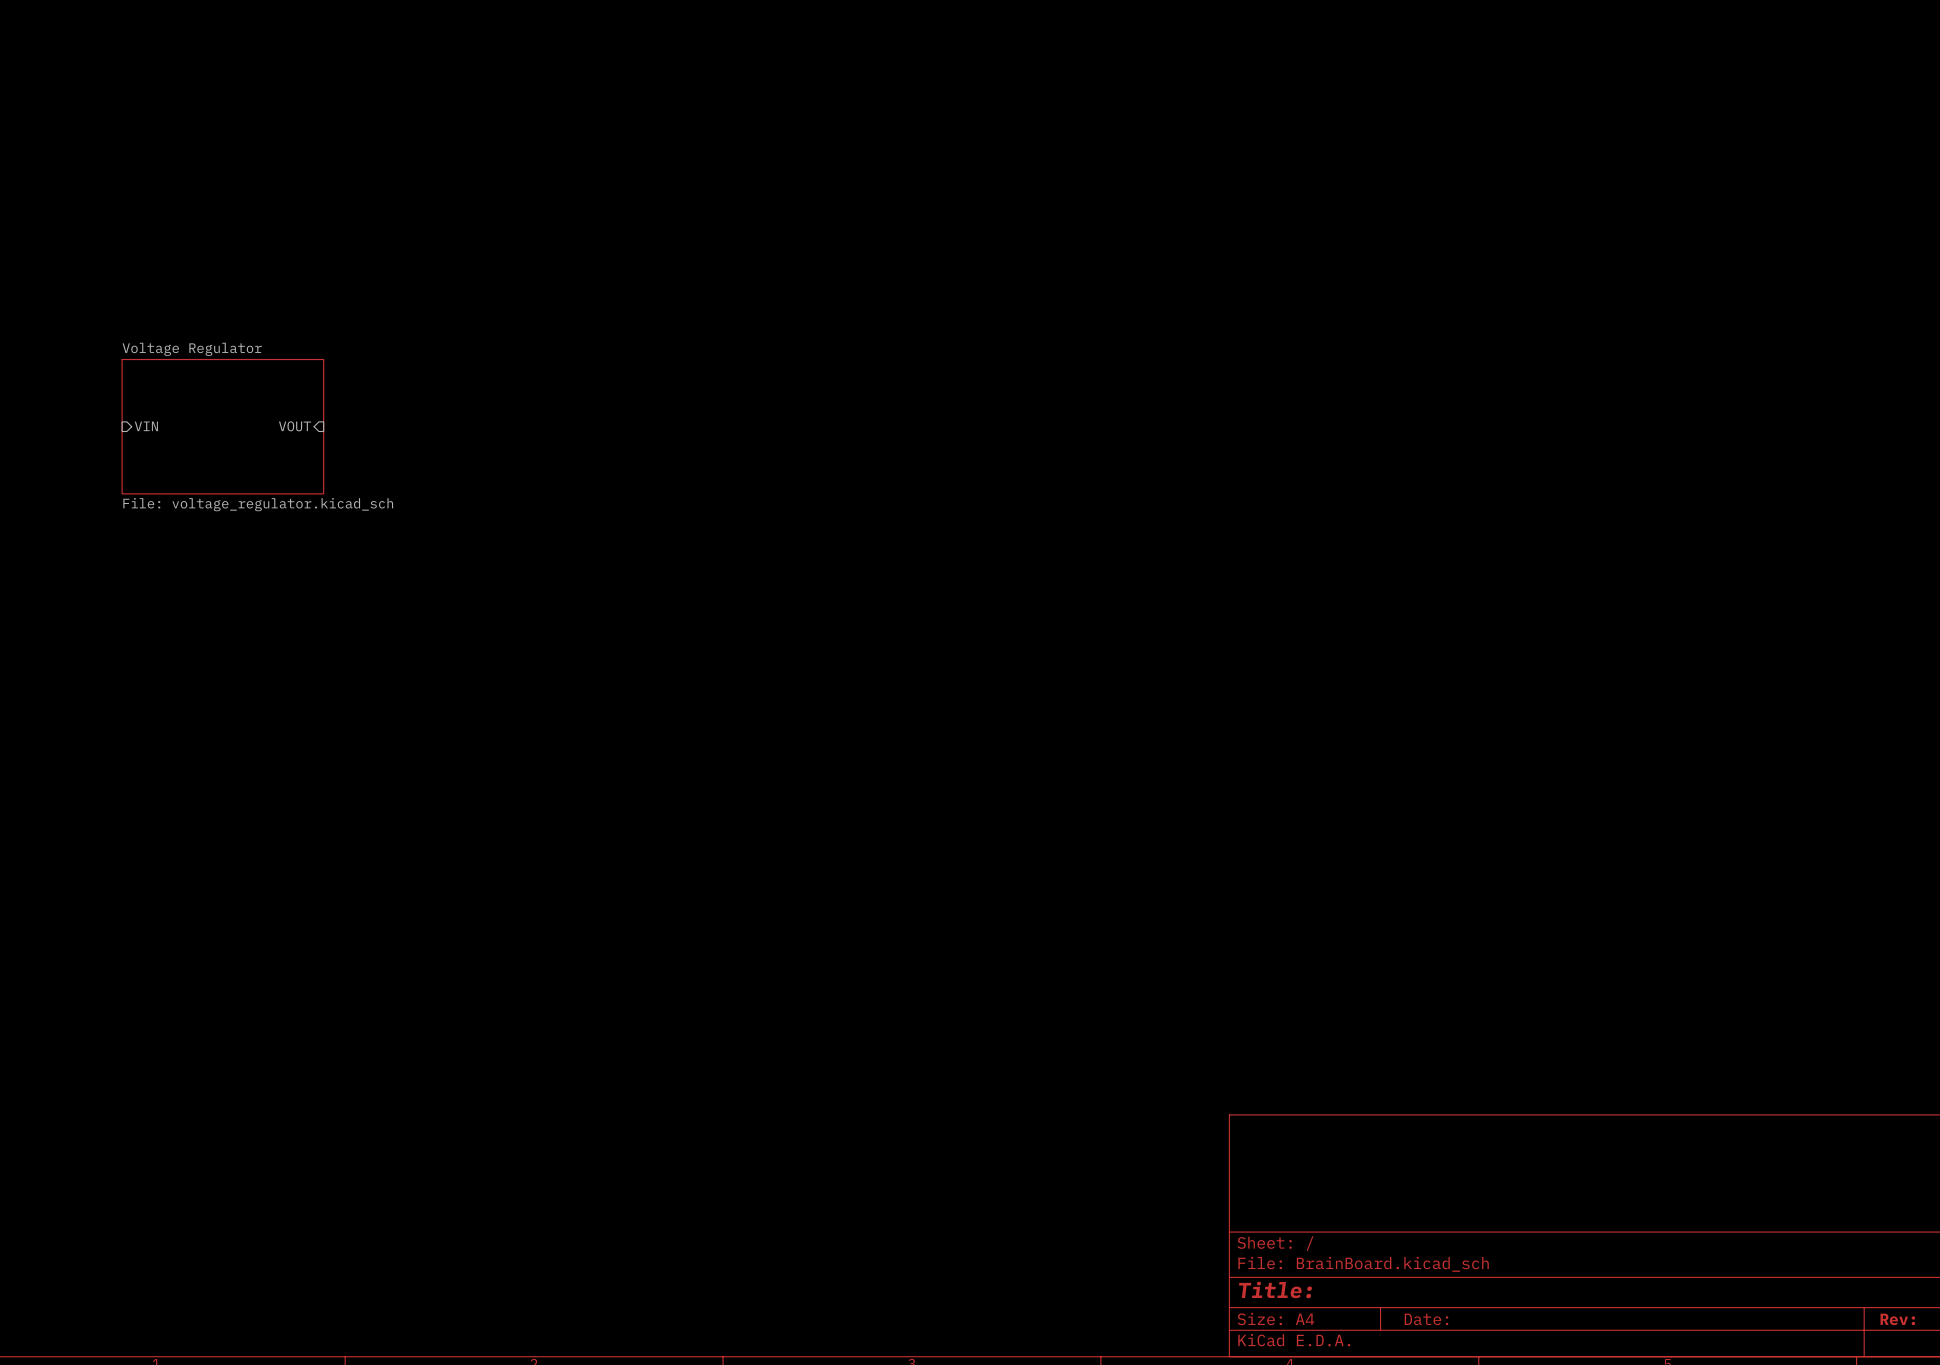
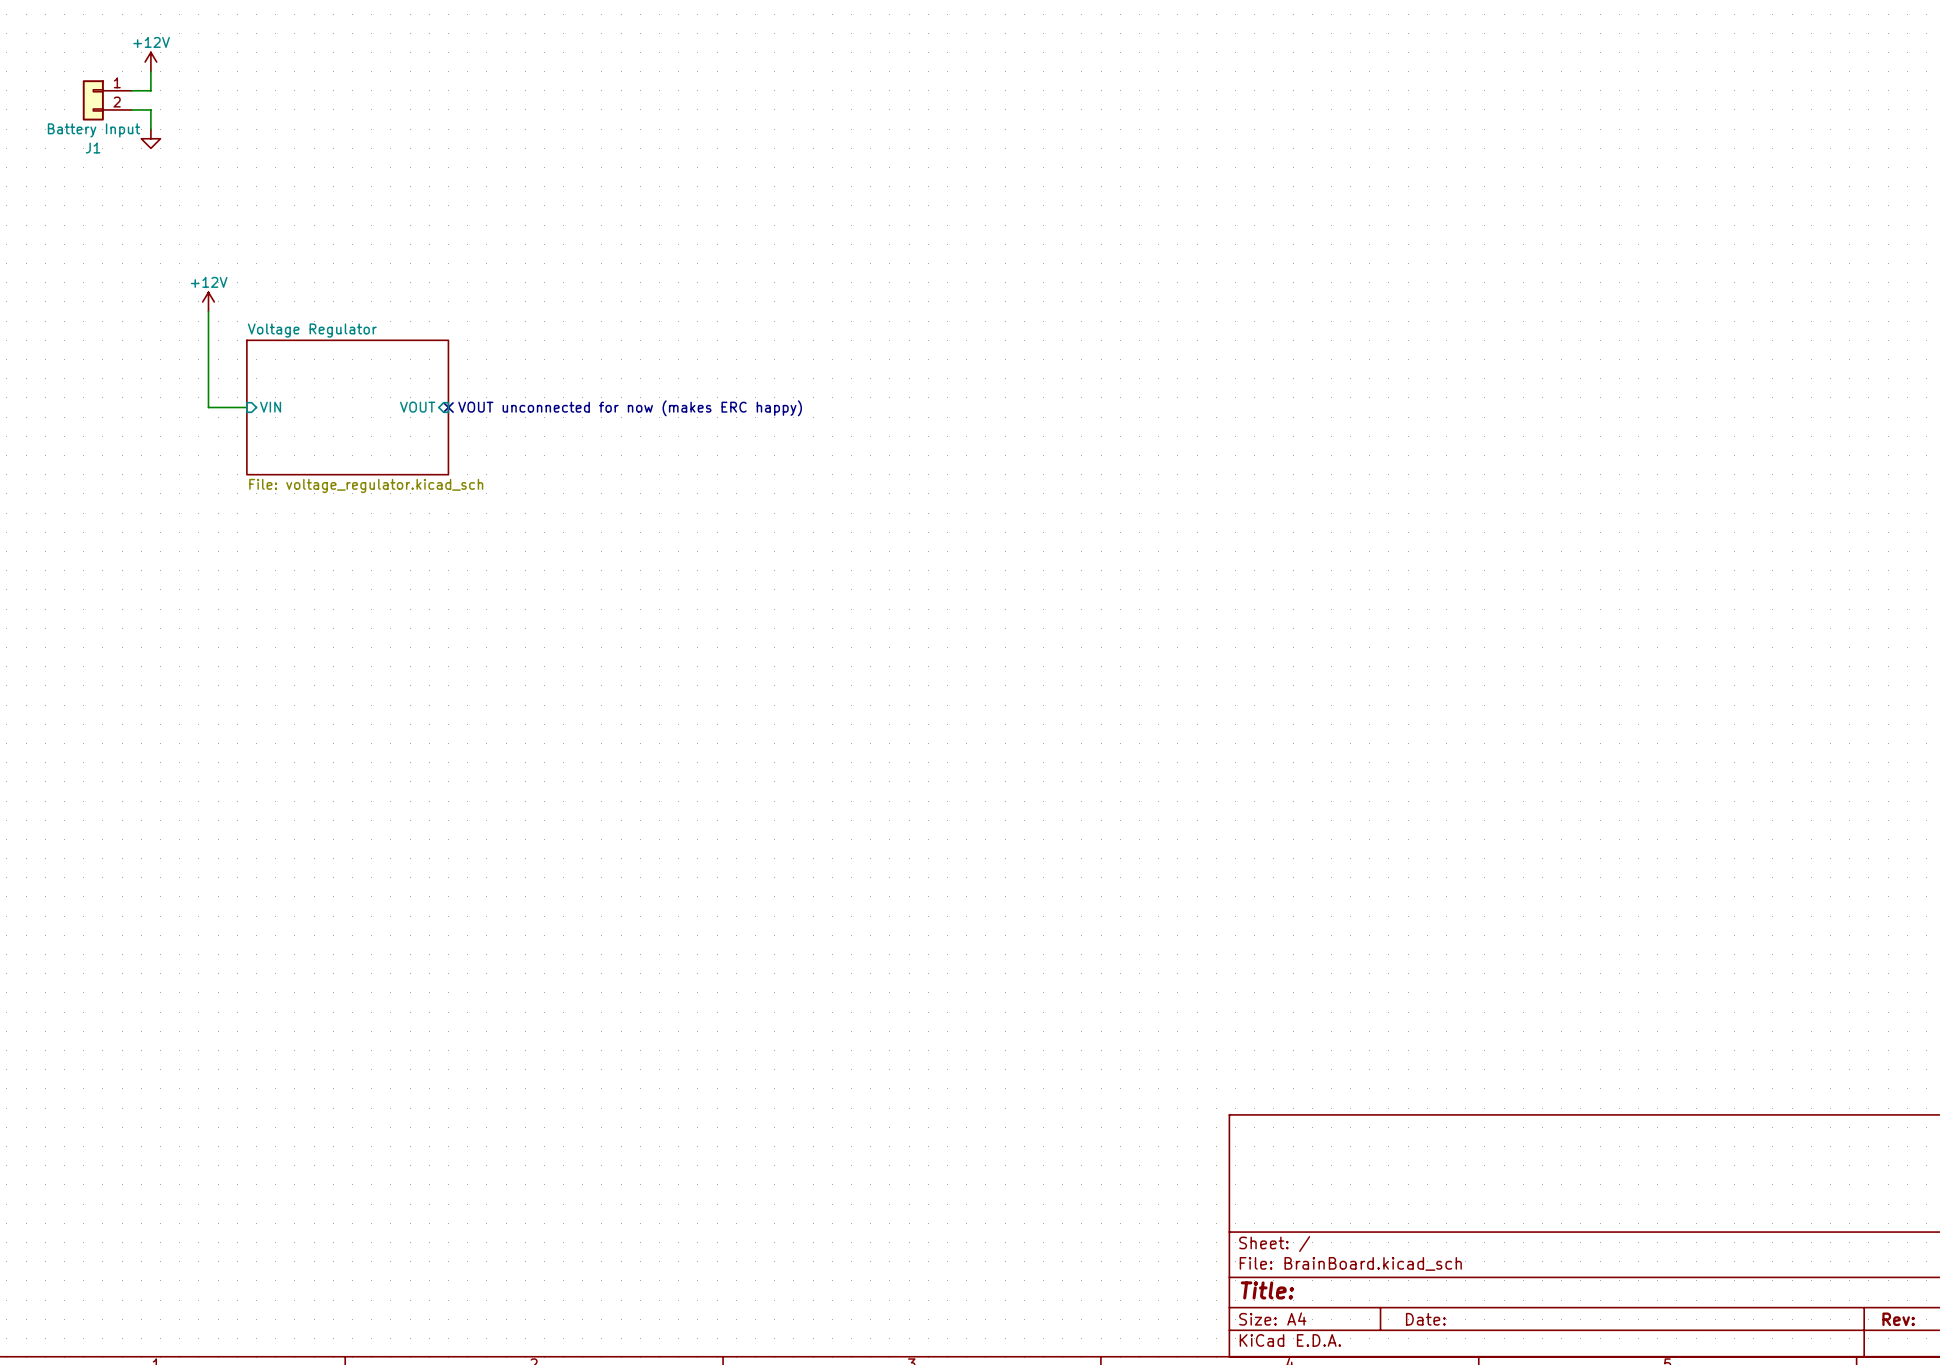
power symbol: none -> +12V (150, 61)
wire: none -> (150, 71) (150, 90) (131, 90)
J1: none -> Battery Input (107, 100)
wire: none -> (131, 109) (150, 109) (150, 129)
power symbol: none -> (150, 138)
power symbol: none -> +12V (208, 301)
wire: none -> (208, 311) (208, 407) (246, 407)
no-connect mark: none -> (448, 407)
text: none -> VOUT unconnected for now (makes ERC happy) (630, 408)
sheet pin position: VIN (146, 426) -> VIN (270, 407)
sheet Voltage Regulator position: (222, 426) -> (347, 407)
sheet pin position: VOUT (295, 426) -> VOUT (417, 407)

